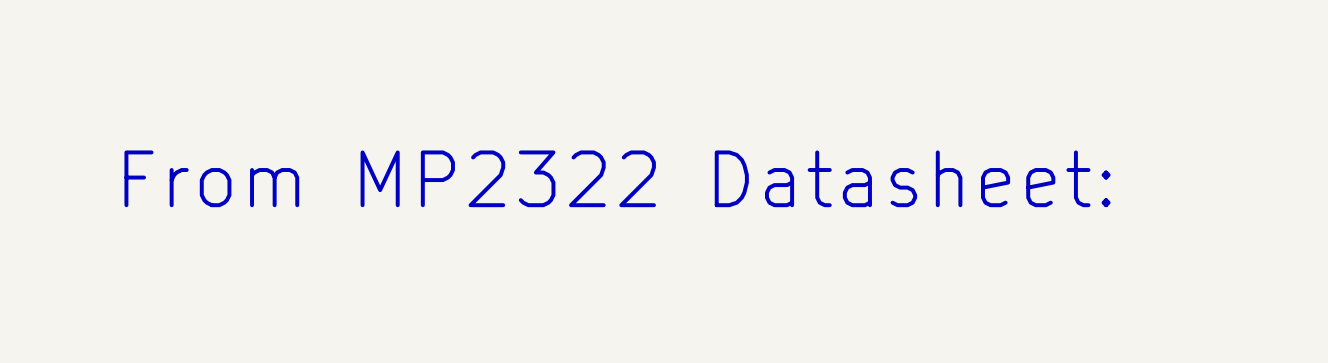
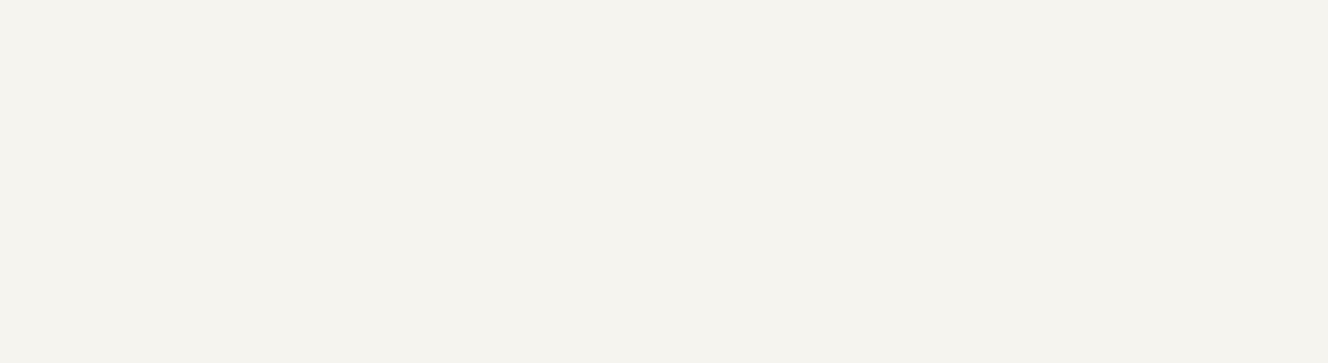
text: From MP2322 Datasheet: (617, 178) -> none

